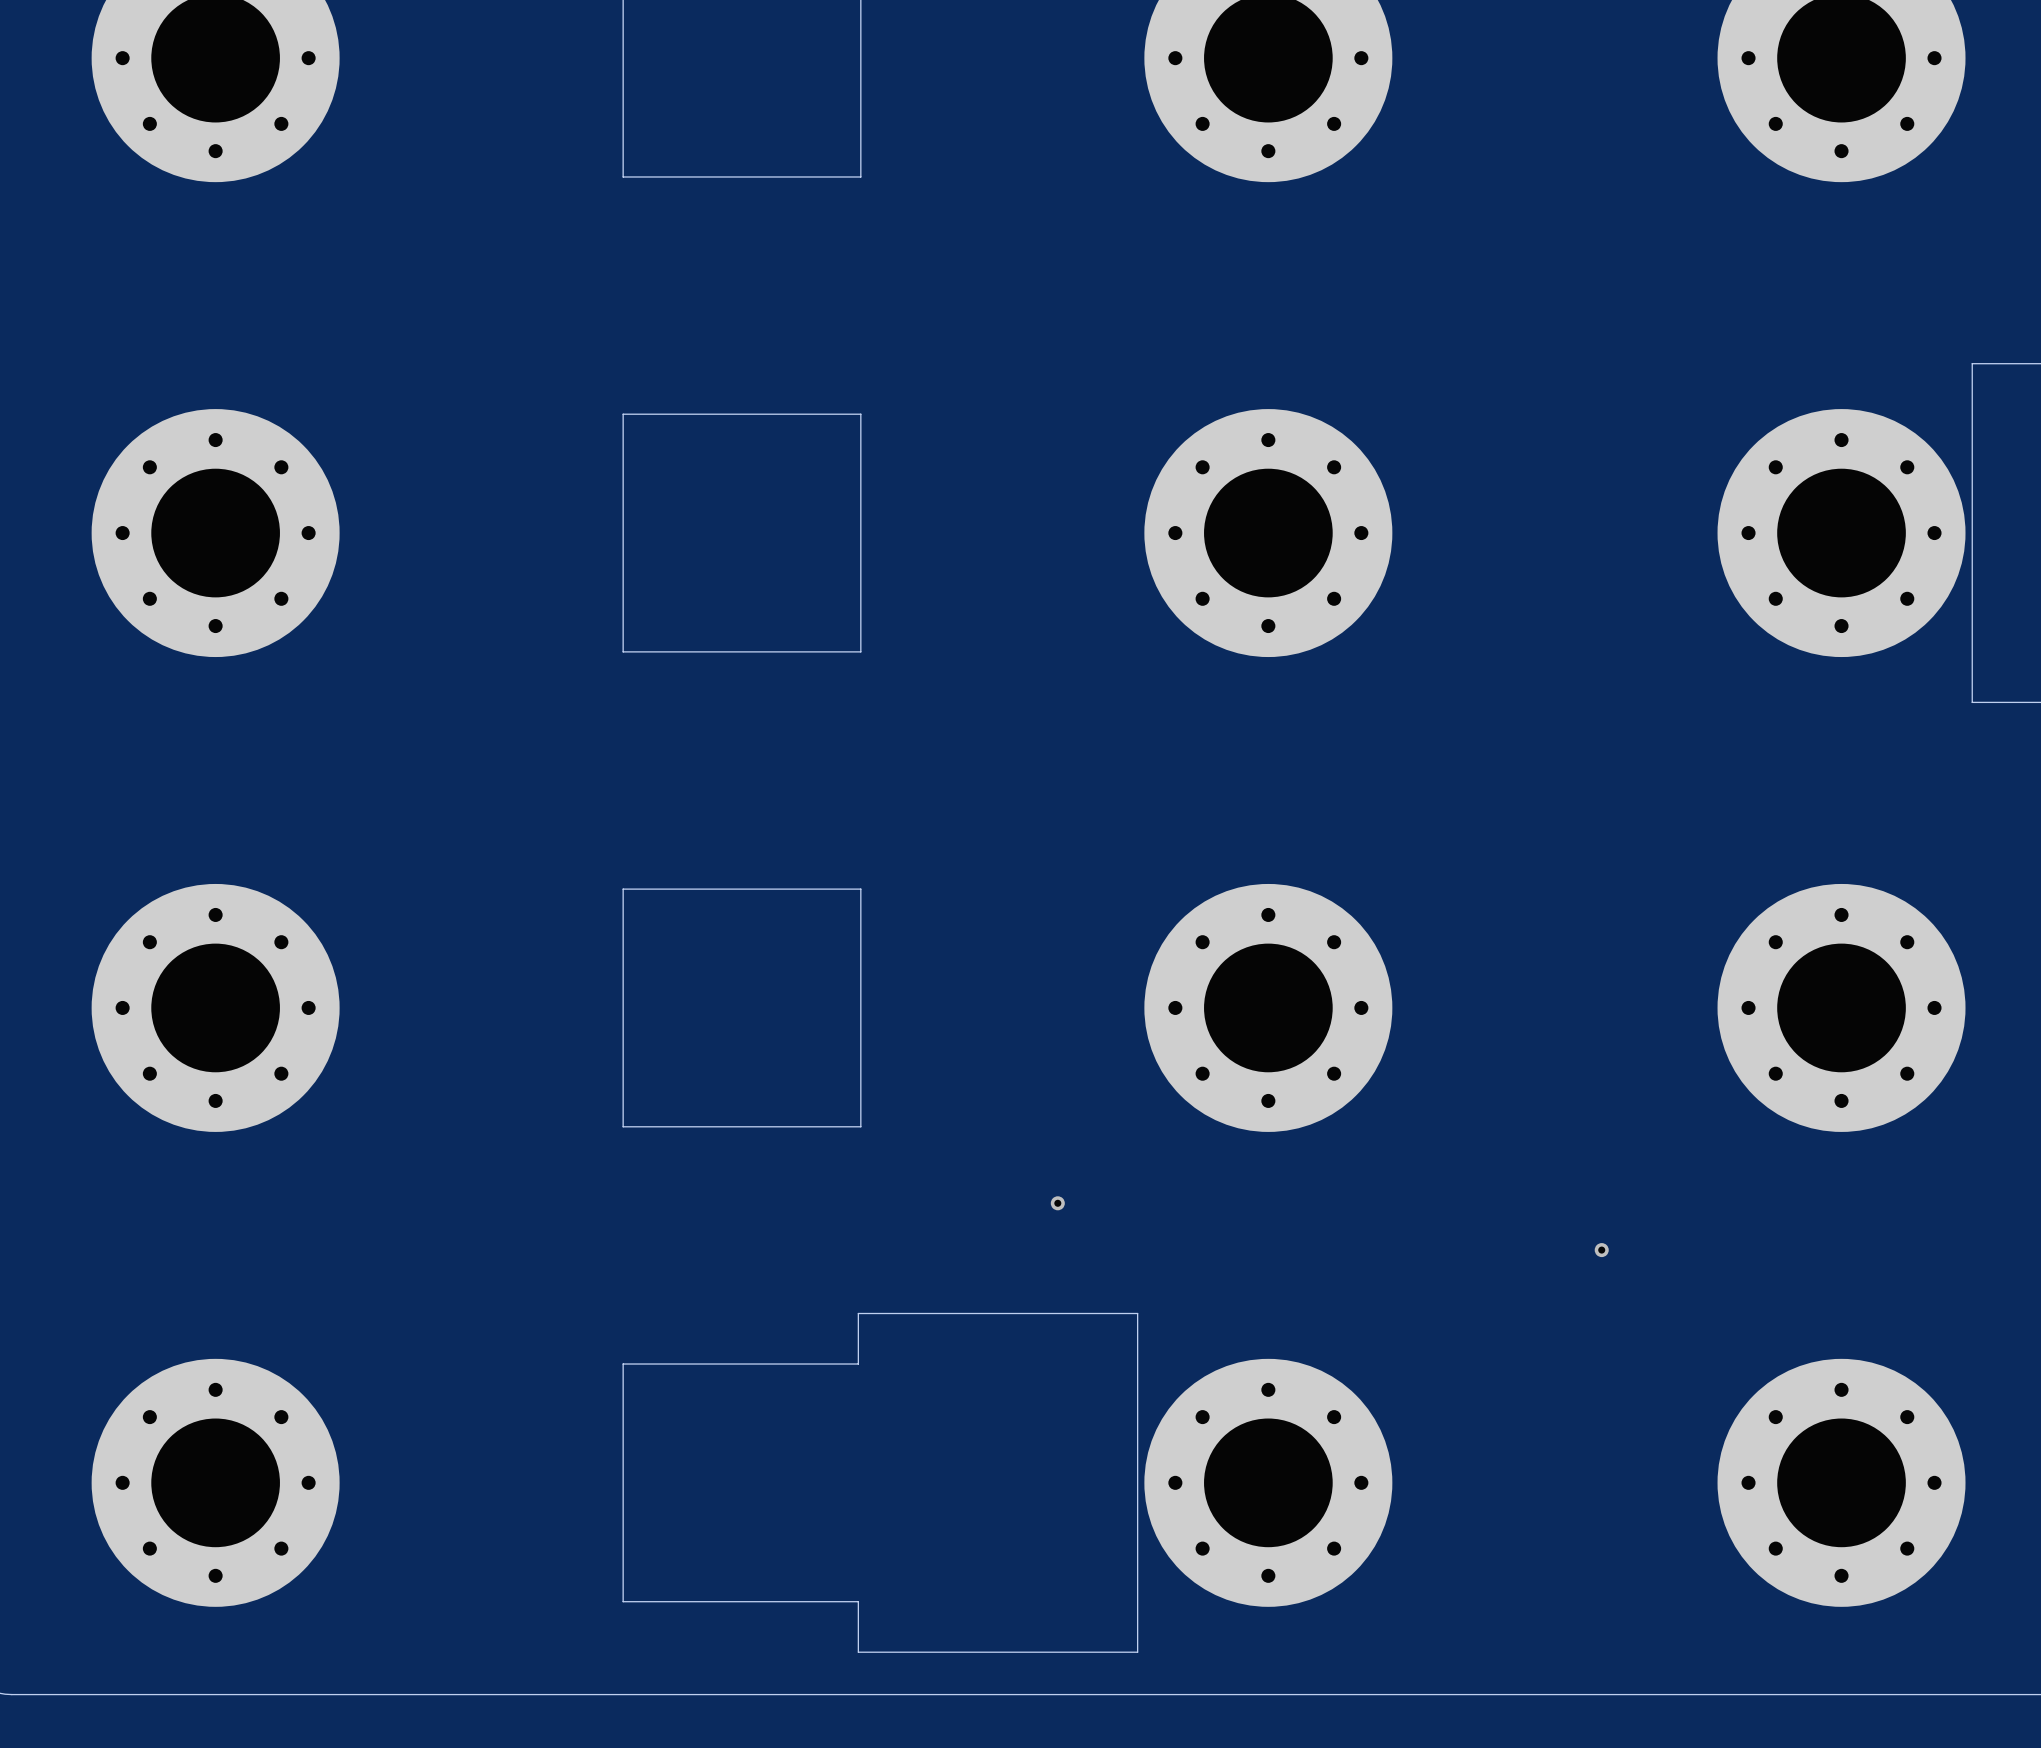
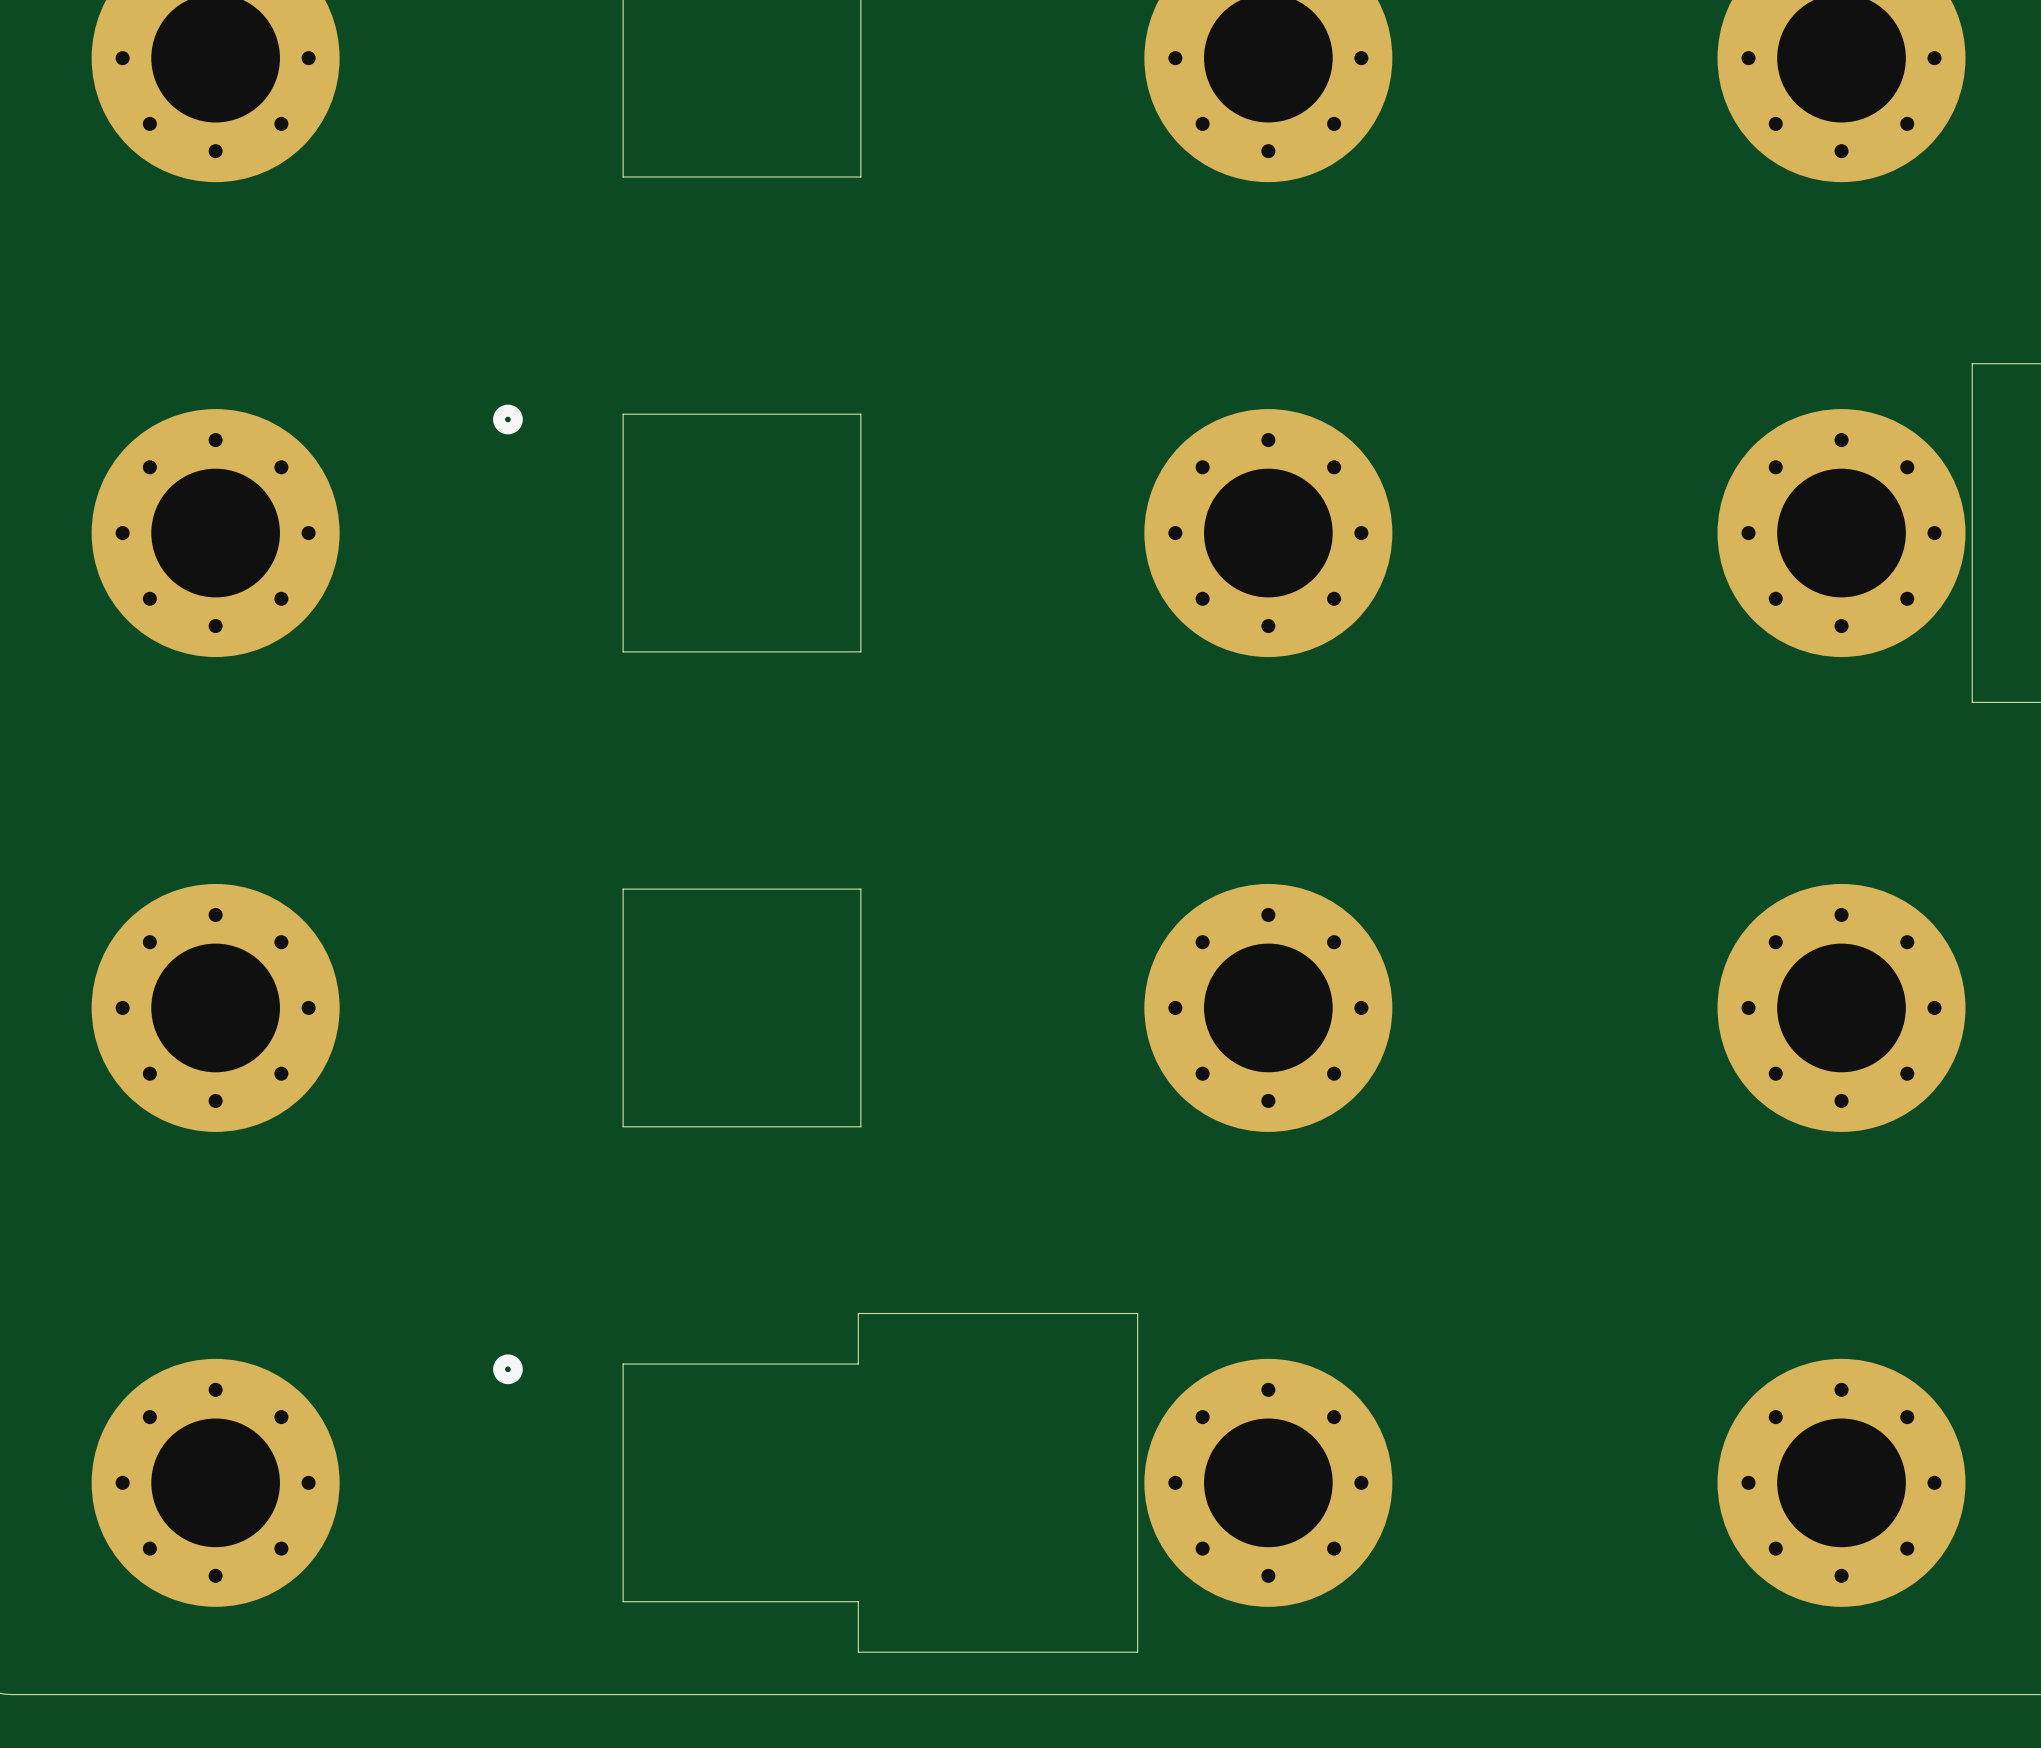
part: none -> (507, 419)
via: (1057, 1203) -> none
via: (1601, 1250) -> none
part: none -> (507, 1369)

